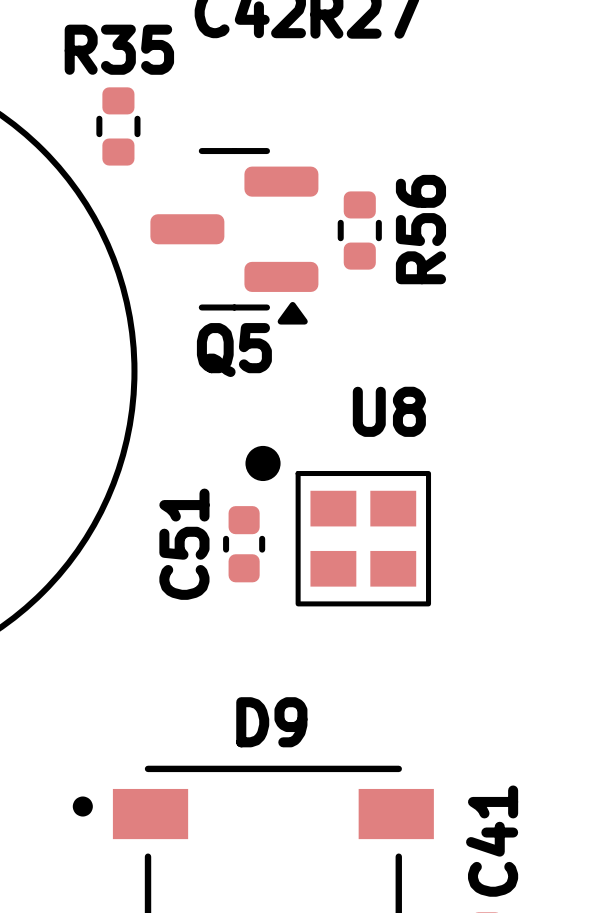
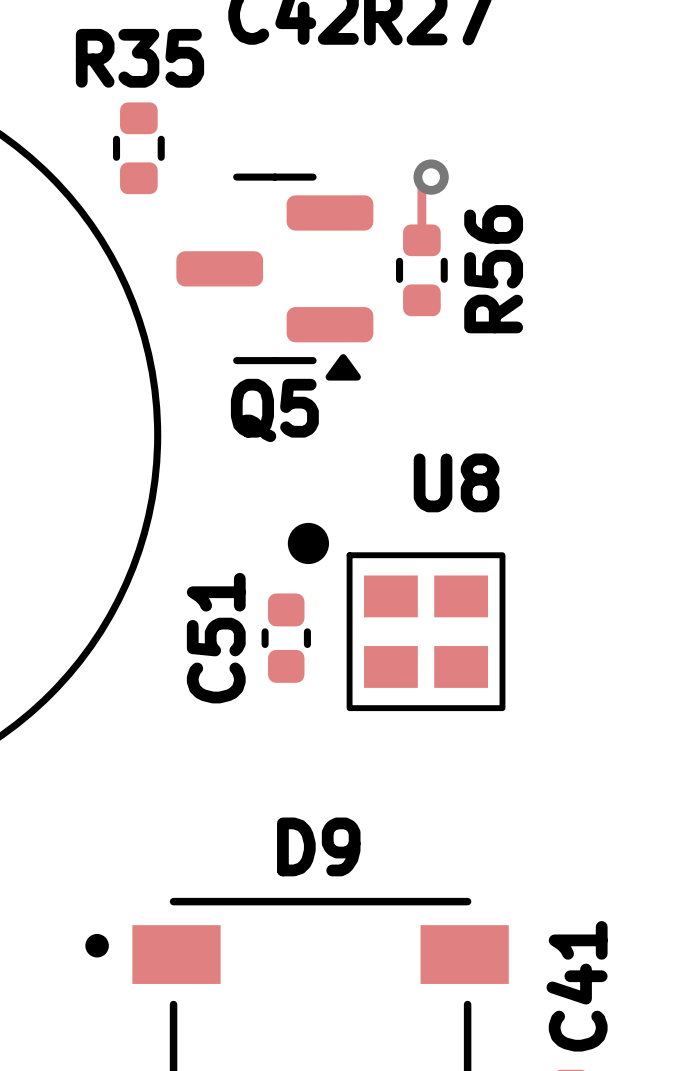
top track: none -> (431, 177) (421, 186) (421, 240)
via: none -> (431, 177)

